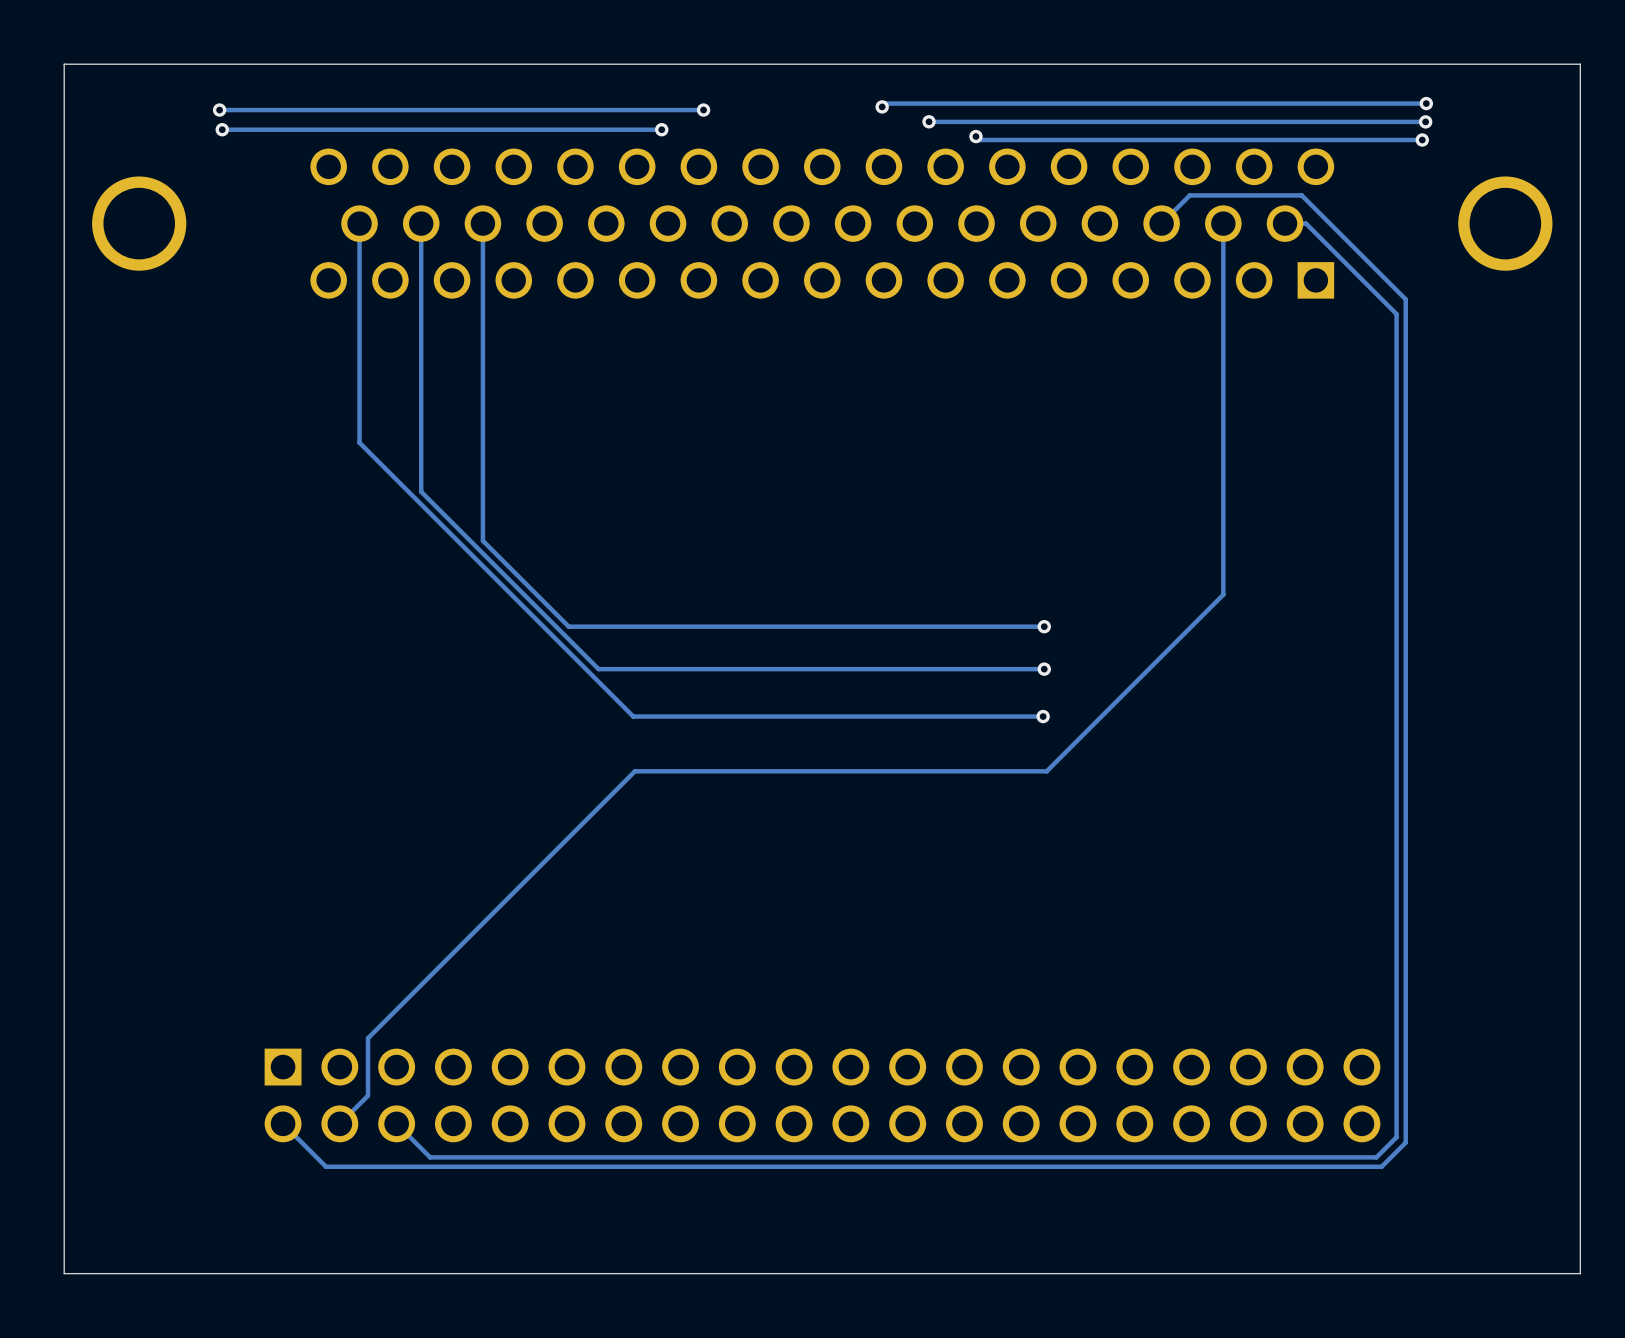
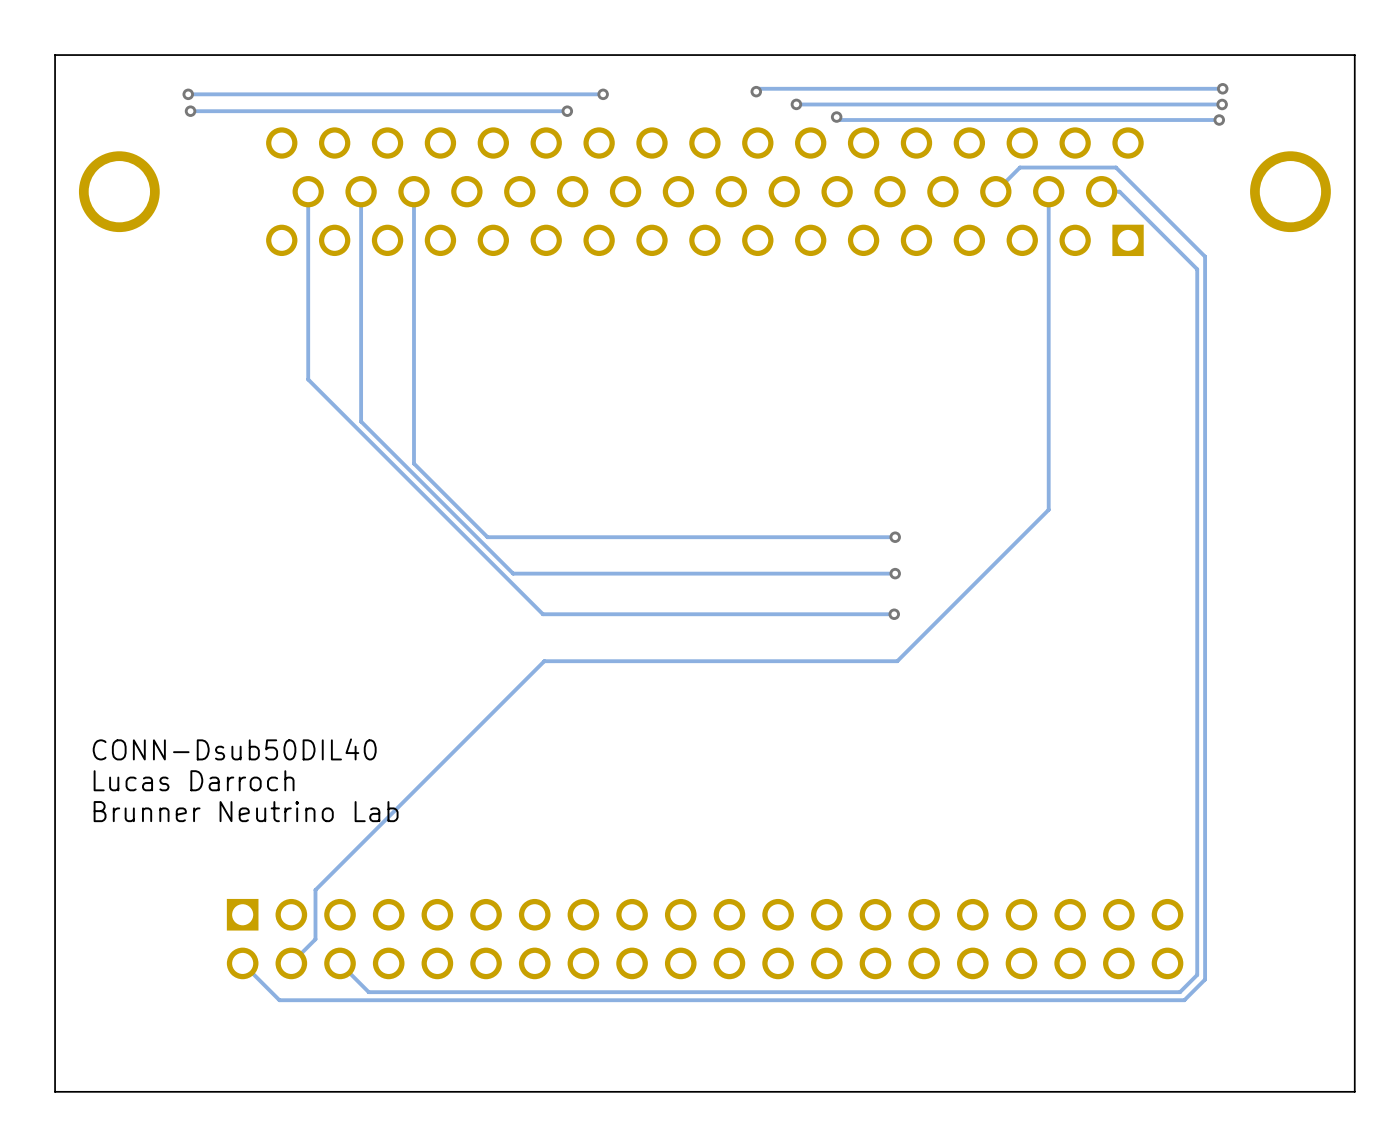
text: none -> CONN-Dsub50DIL40 (234, 749)
text: none -> Lucas Darroch (194, 780)
text: none -> Brunner Neutrino Lab (246, 811)

